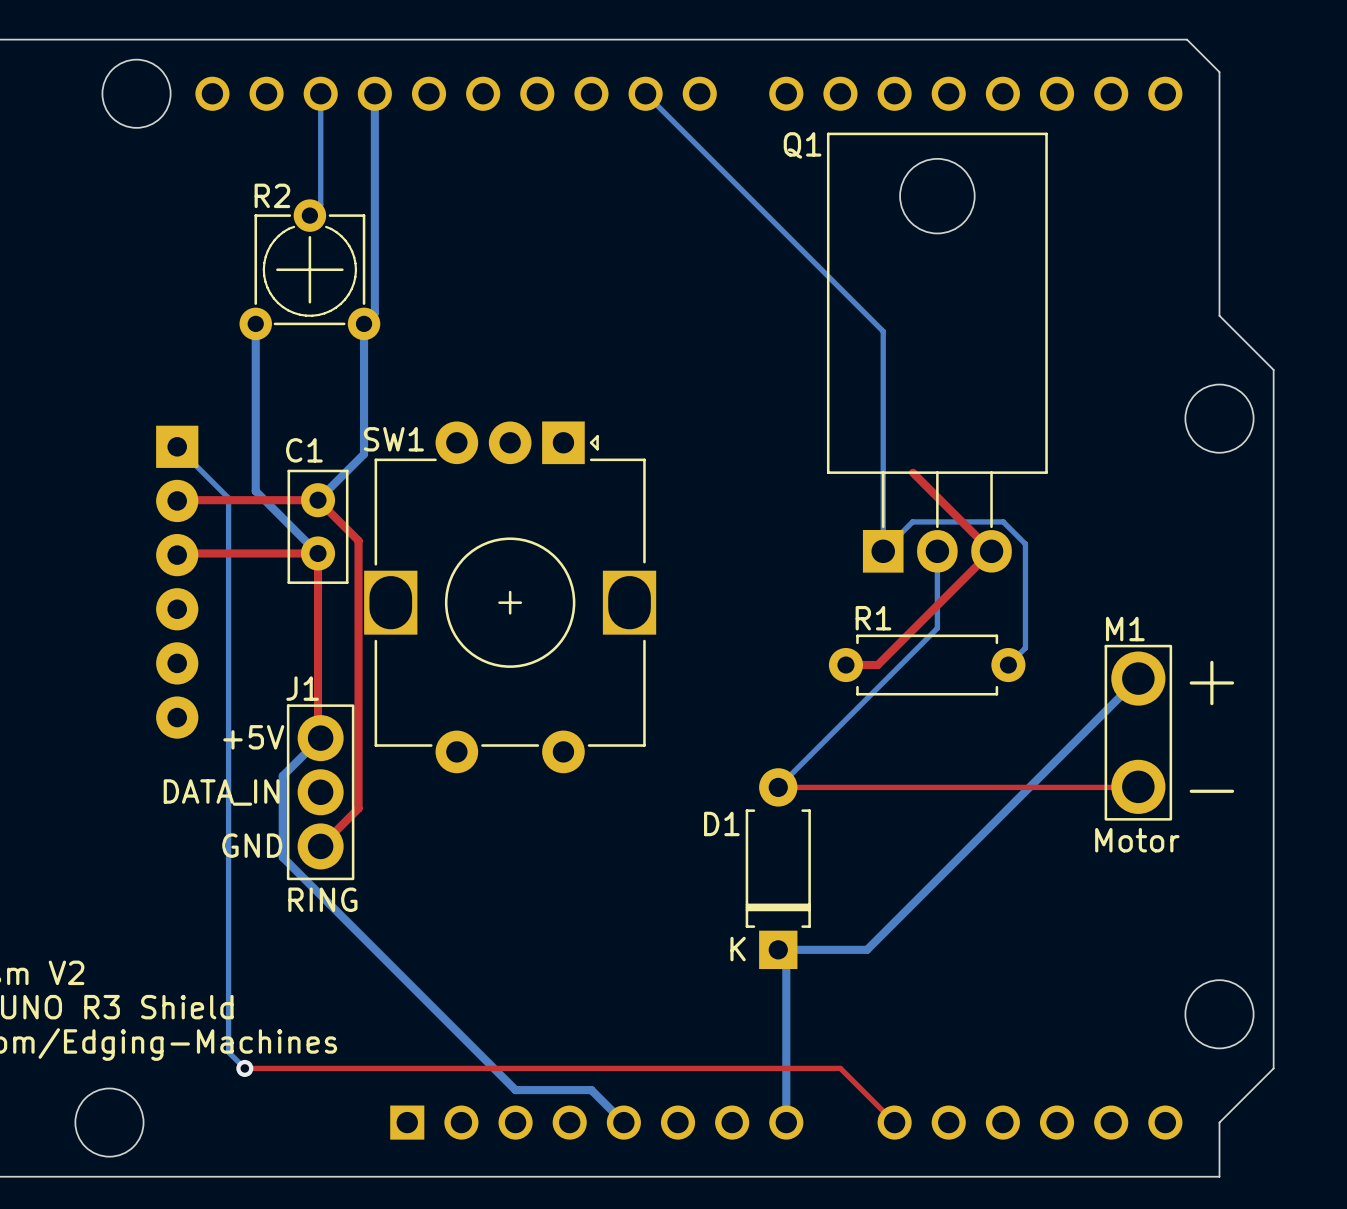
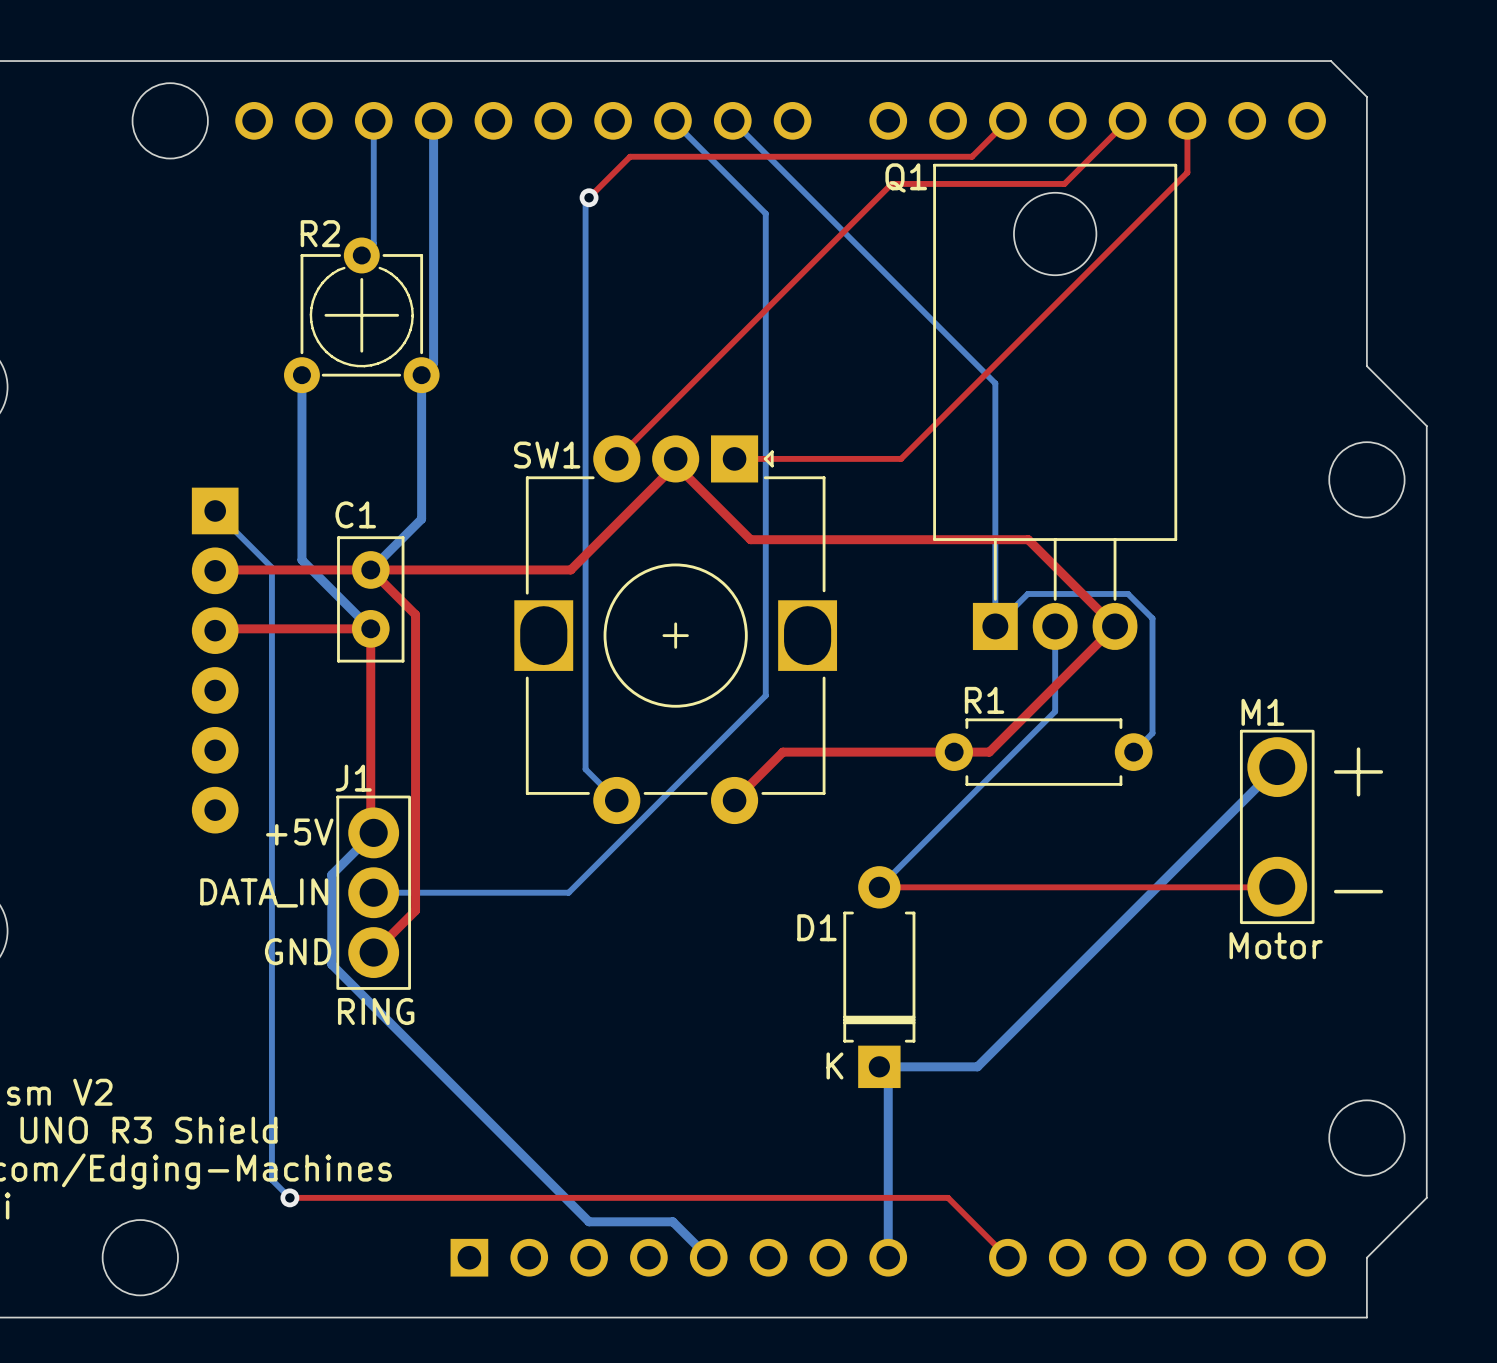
bottom track: none -> (672, 120) (765, 213) (765, 695) (568, 892) (373, 892)
top track: none -> (1007, 120) (972, 156) (630, 156) (589, 197)
top track: none -> (1127, 120) (1064, 183) (891, 183) (616, 458)
top track: none -> (1187, 120) (1187, 172) (901, 458) (734, 458)
bottom track: none -> (589, 197) (585, 197) (585, 769) (616, 800)
via: none -> (589, 197)
top track: none -> (675, 458) (675, 465) (570, 569) (370, 569)
top track: none -> (675, 464) (750, 539) (1028, 539)
SW1 position: (510, 597) -> (675, 629)
top track: none -> (954, 752) (782, 752) (734, 800)

